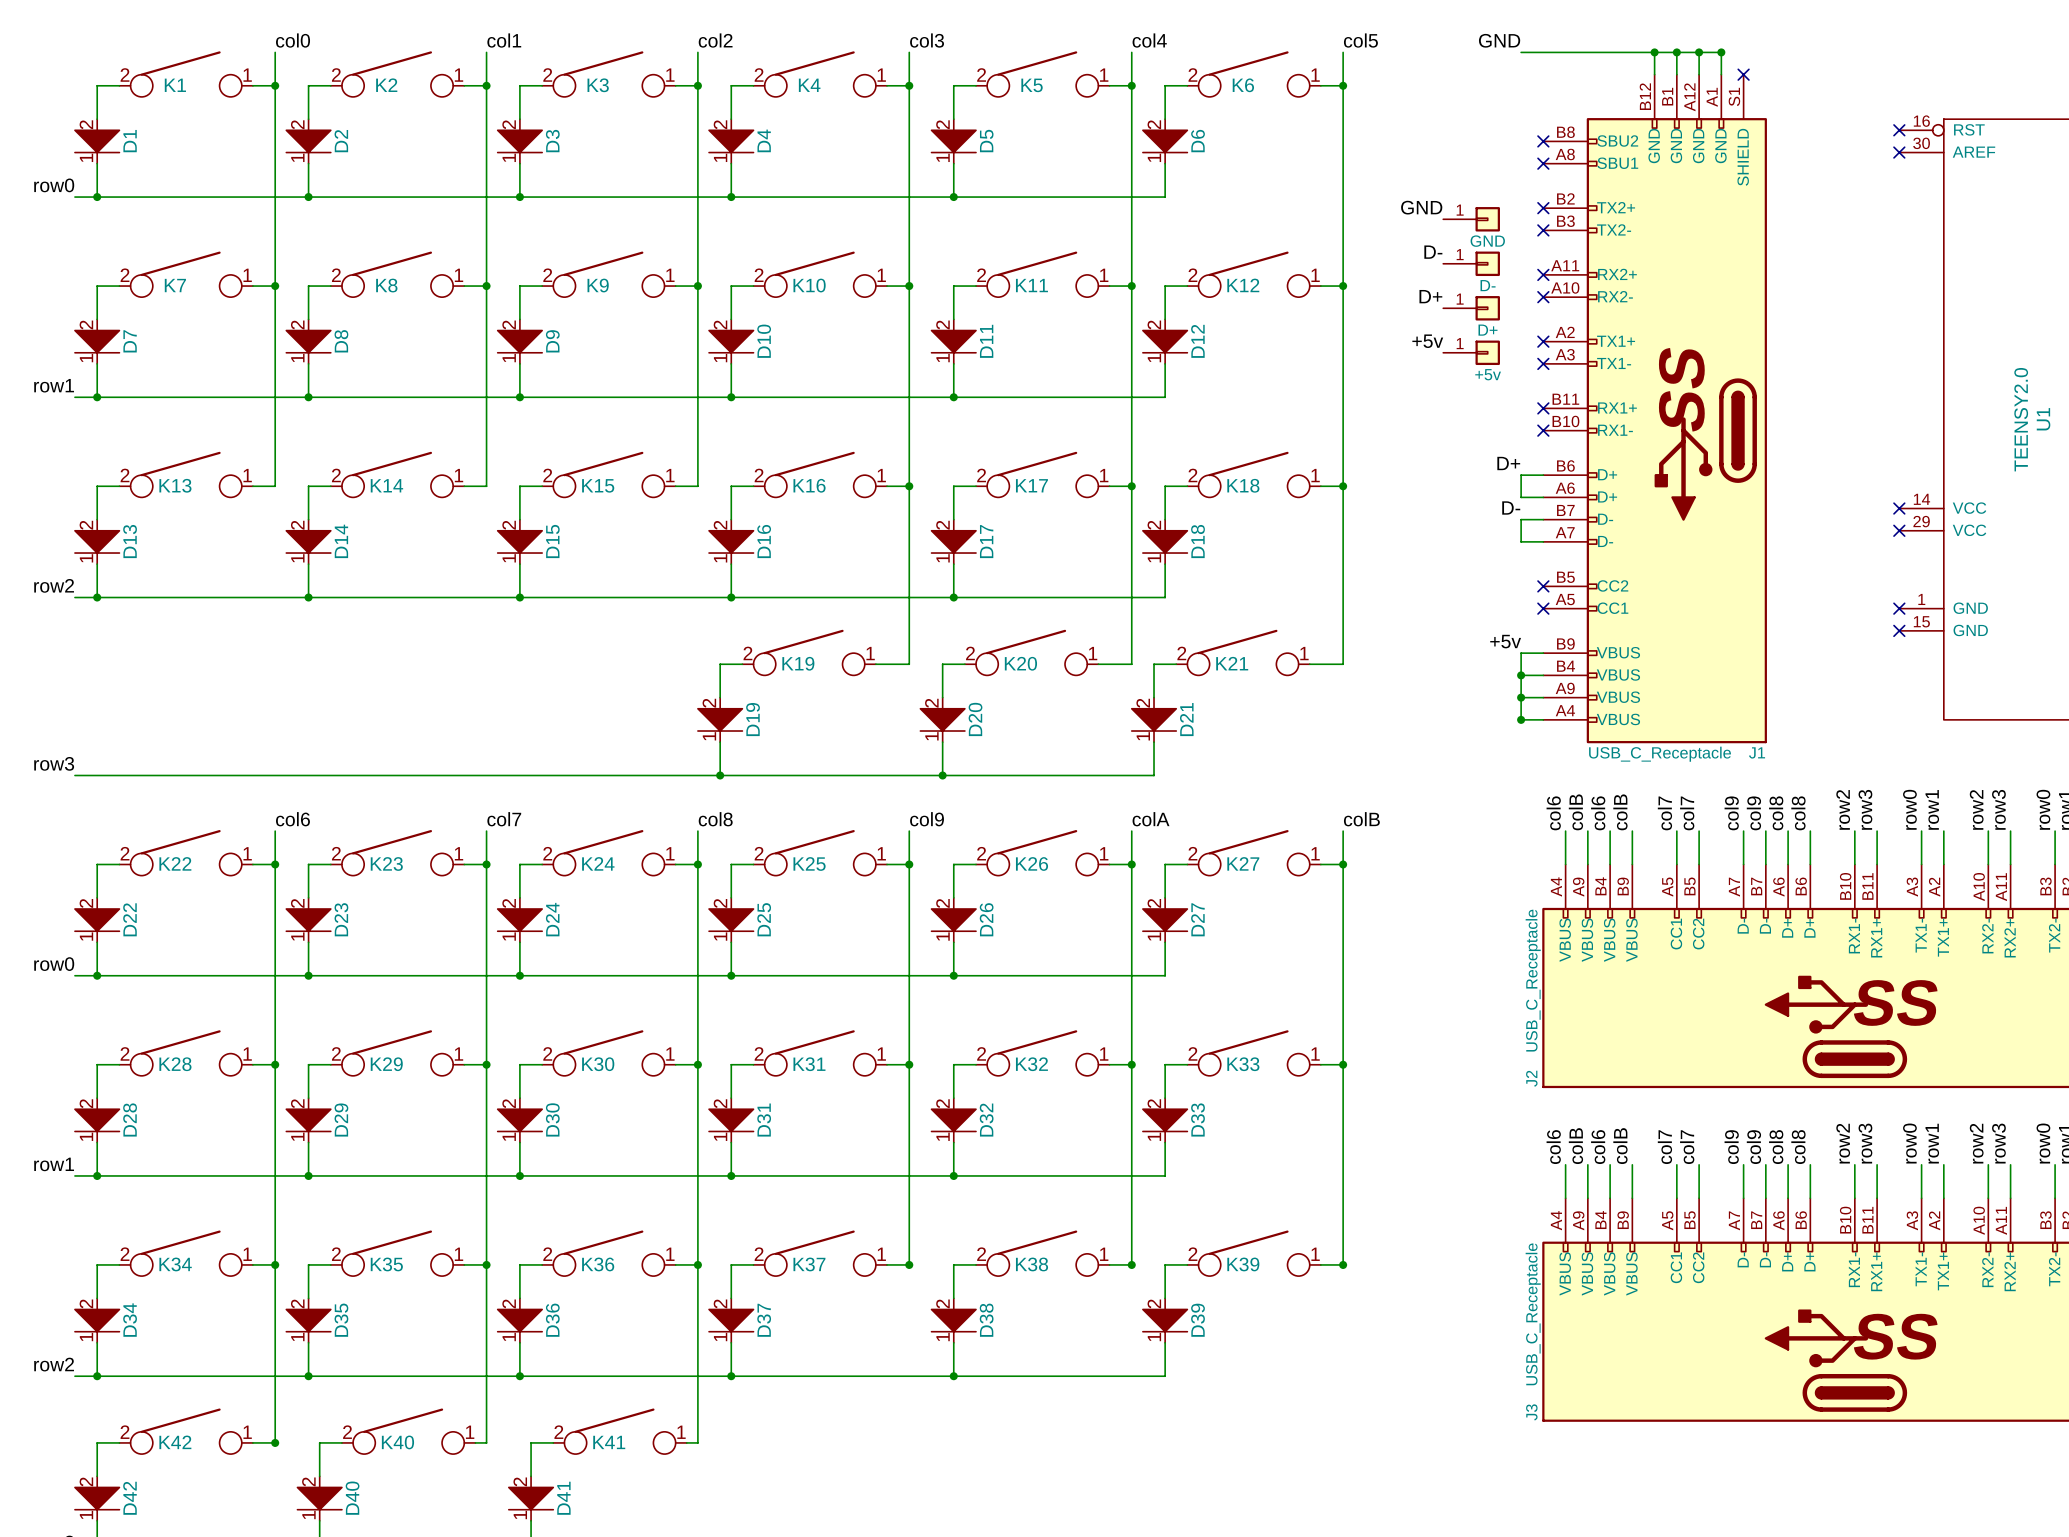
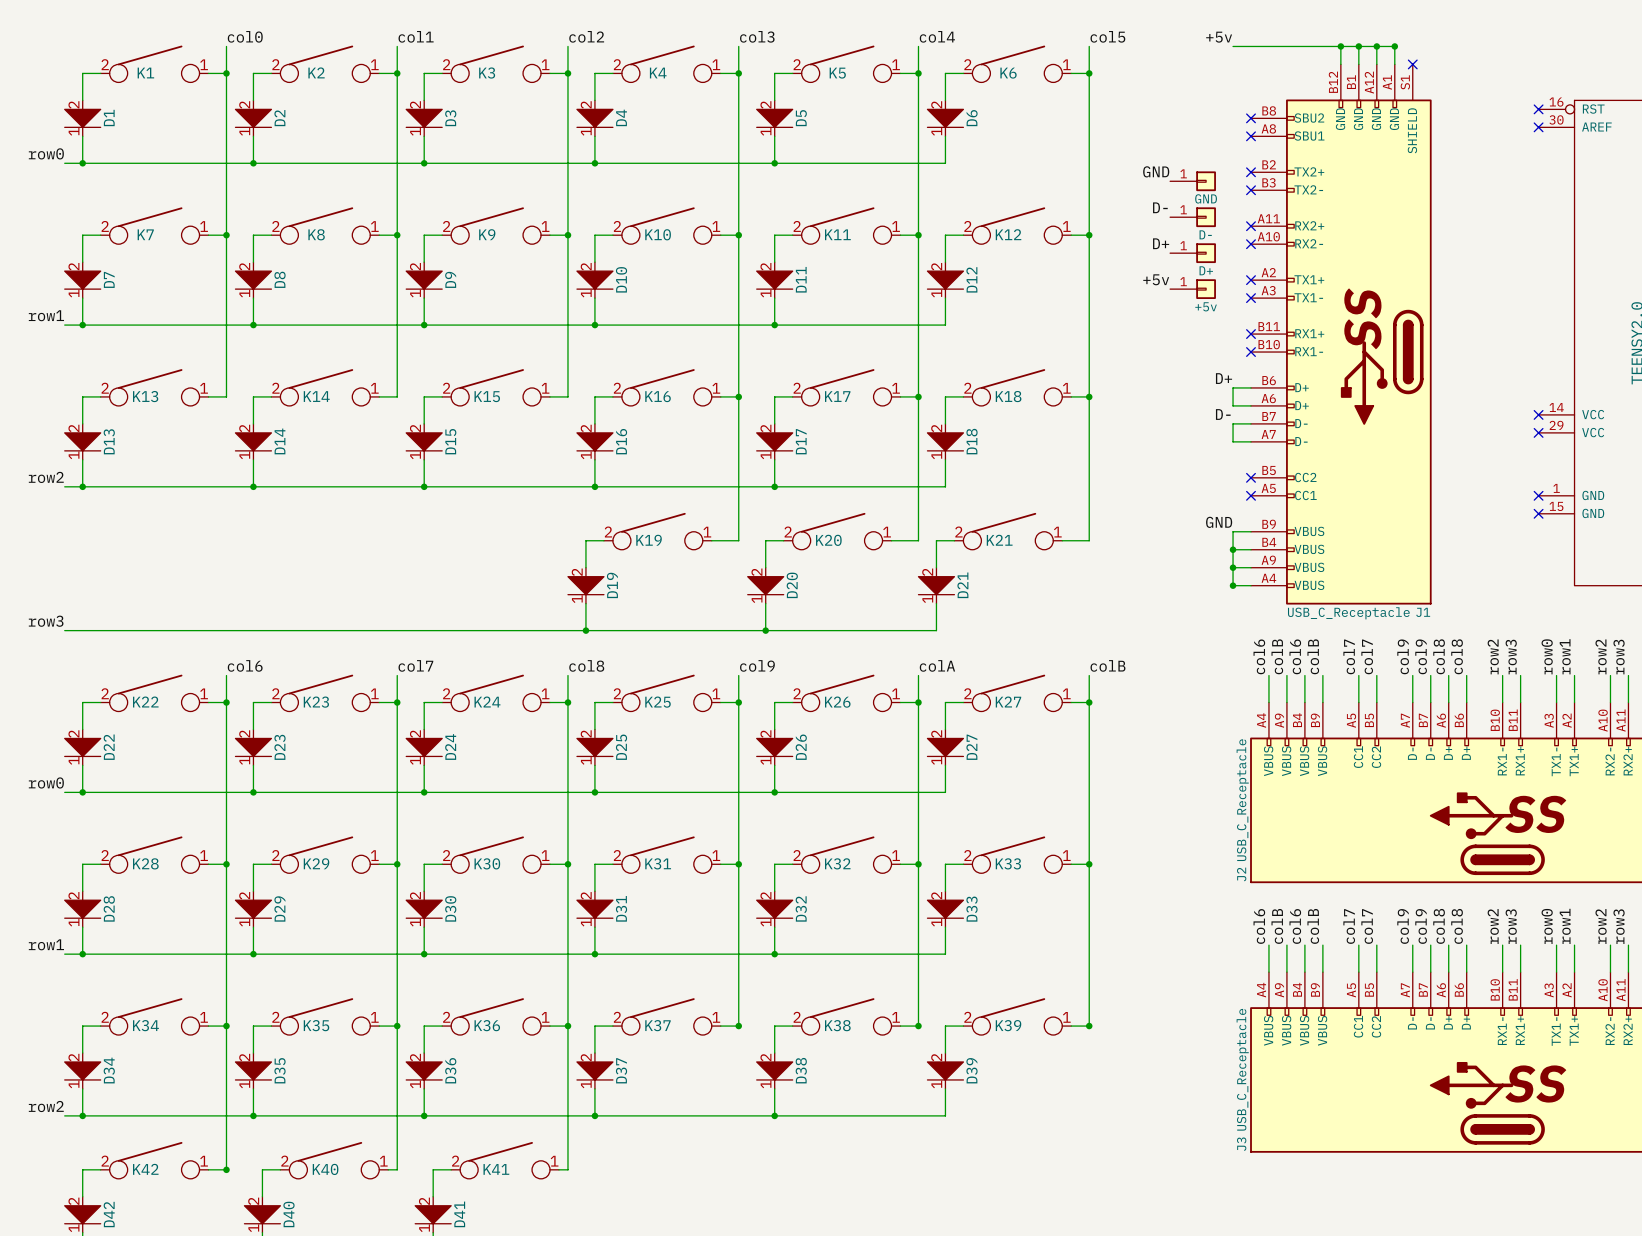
label: GND (1499, 40) -> +5v (1219, 37)
label: +5v (1505, 641) -> GND (1219, 522)

